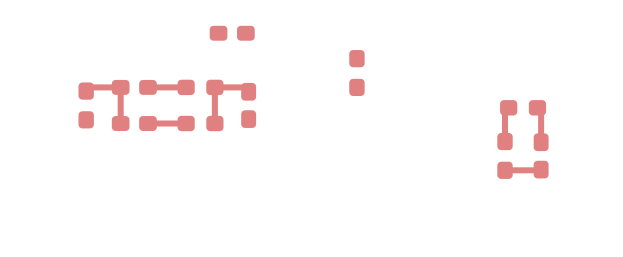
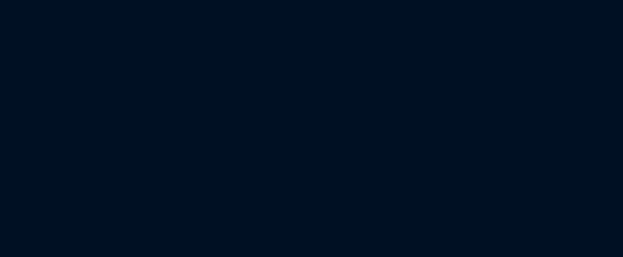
part: (232, 33) -> none
part: (356, 73) -> none
part: (134, 87) -> none
top track: (186, 87) (147, 87) -> none
part: (200, 87) -> none
top track: (86, 91) (89, 87) (120, 87) (120, 123) -> none
top track: (248, 91) (244, 87) (214, 87) (214, 123) -> none
part: (86, 105) -> none
part: (248, 105) -> none
top track: (508, 107) (505, 111) (505, 141) -> none
part: (523, 107) -> none
top track: (537, 107) (541, 111) (541, 142) -> none
part: (134, 123) -> none
top track: (186, 123) (147, 123) -> none
part: (200, 123) -> none
part: (505, 155) -> none
part: (541, 155) -> none
top track: (541, 169) (505, 170) -> none

